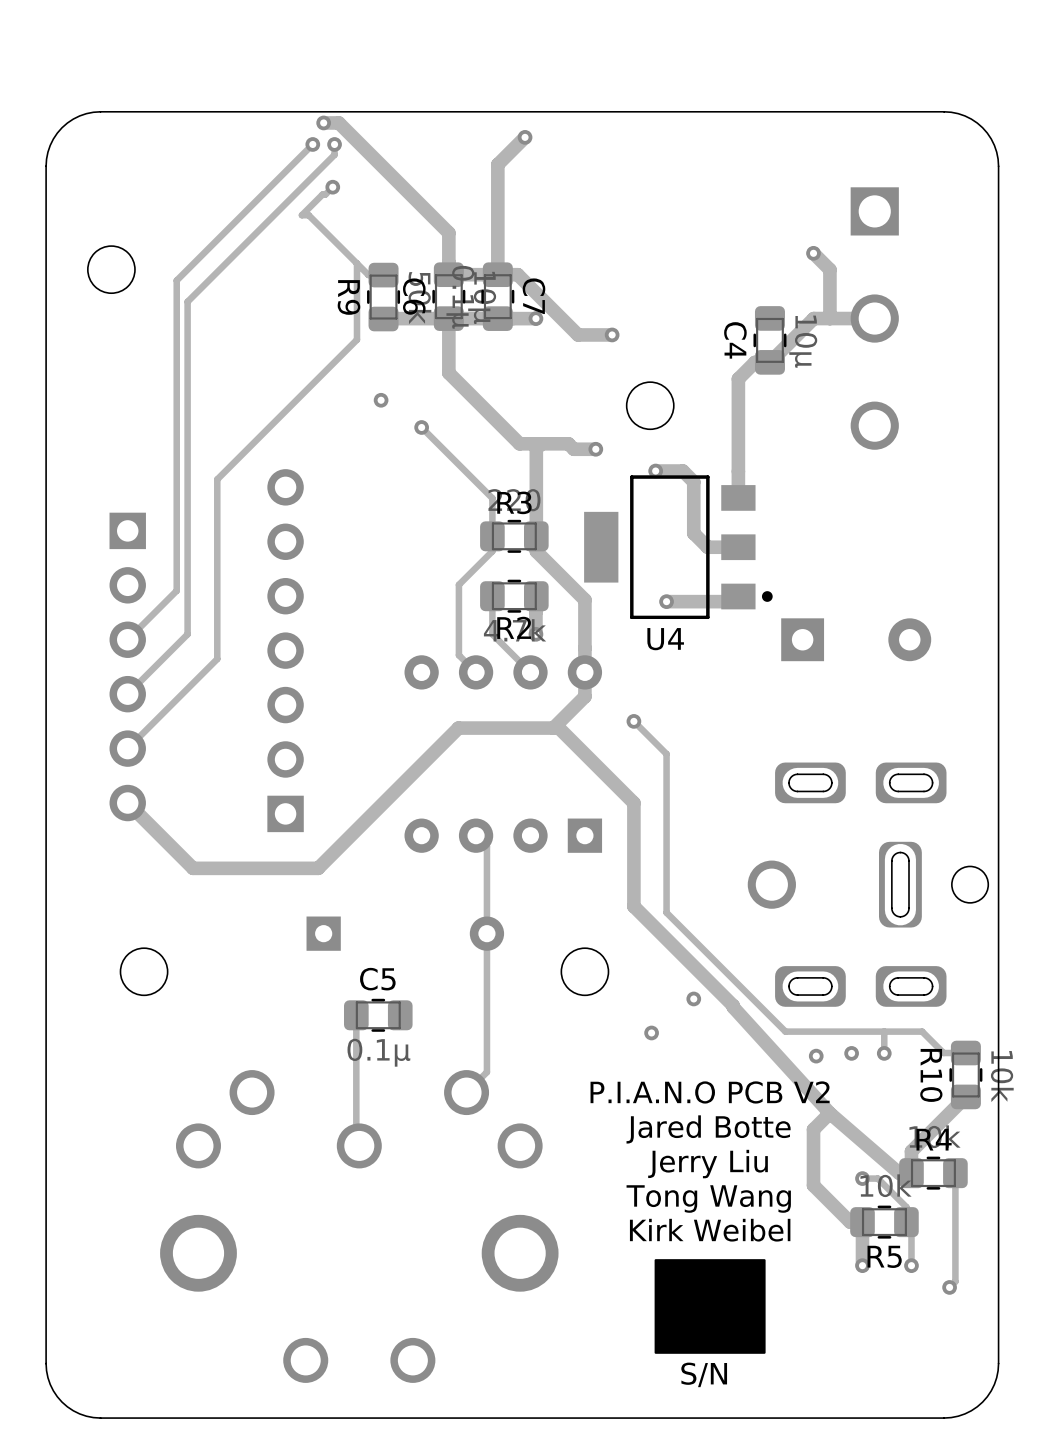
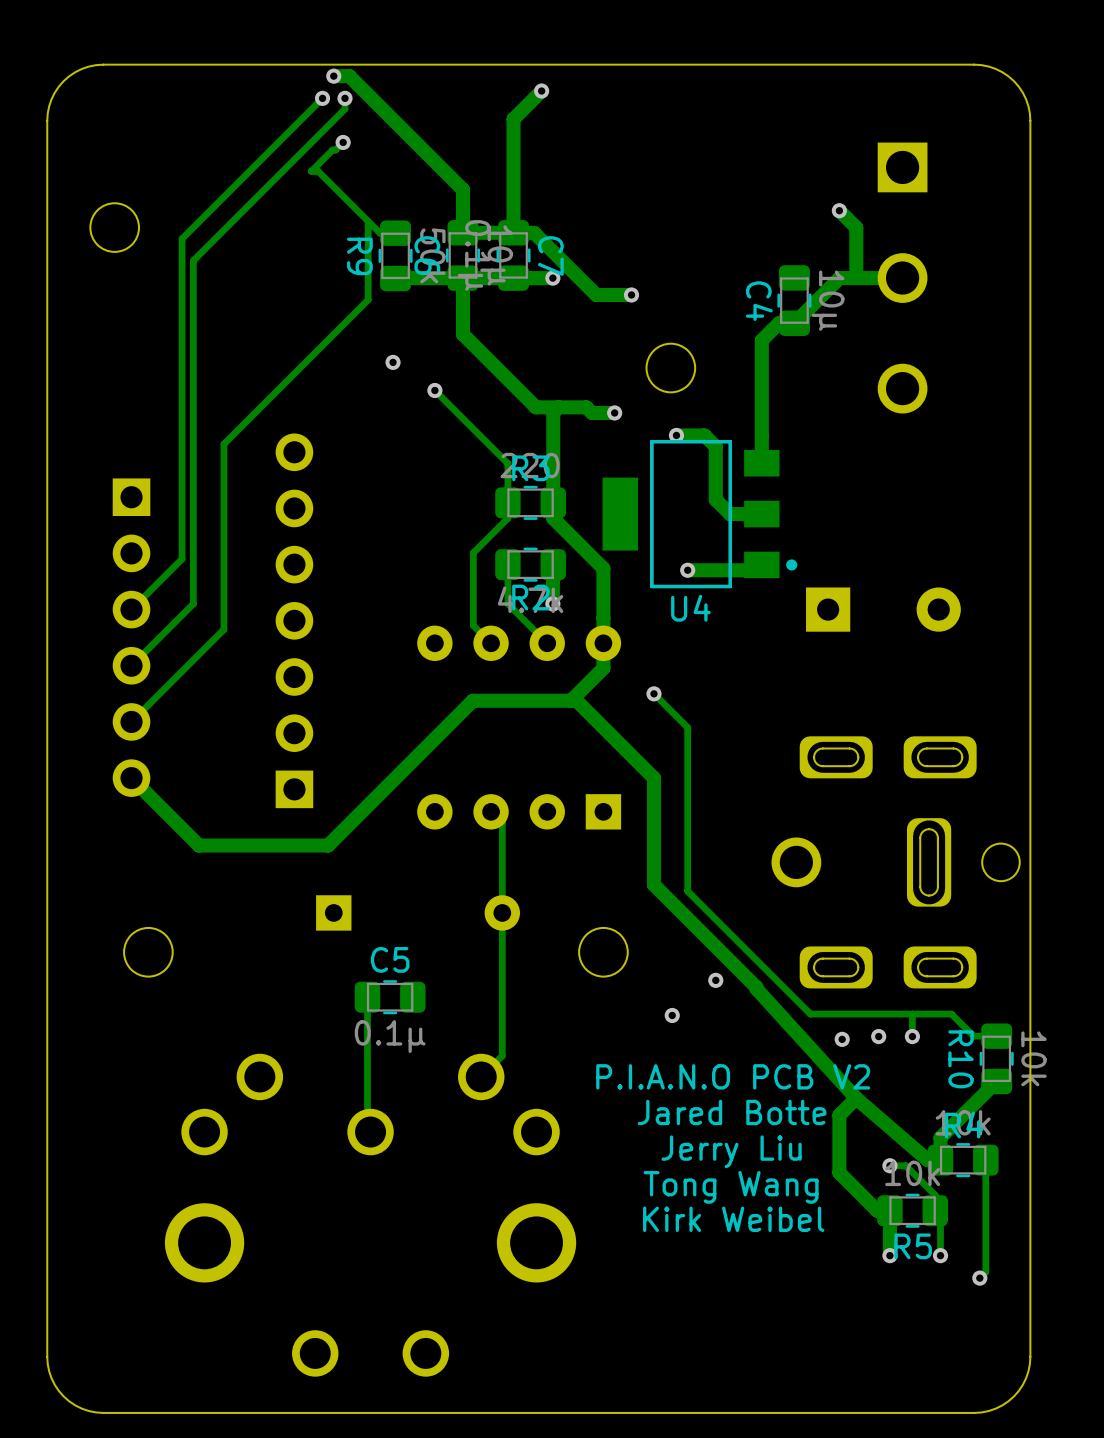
drawing: [654, 1259, 766, 1354] -> none
text: S/N (704, 1374) -> none

